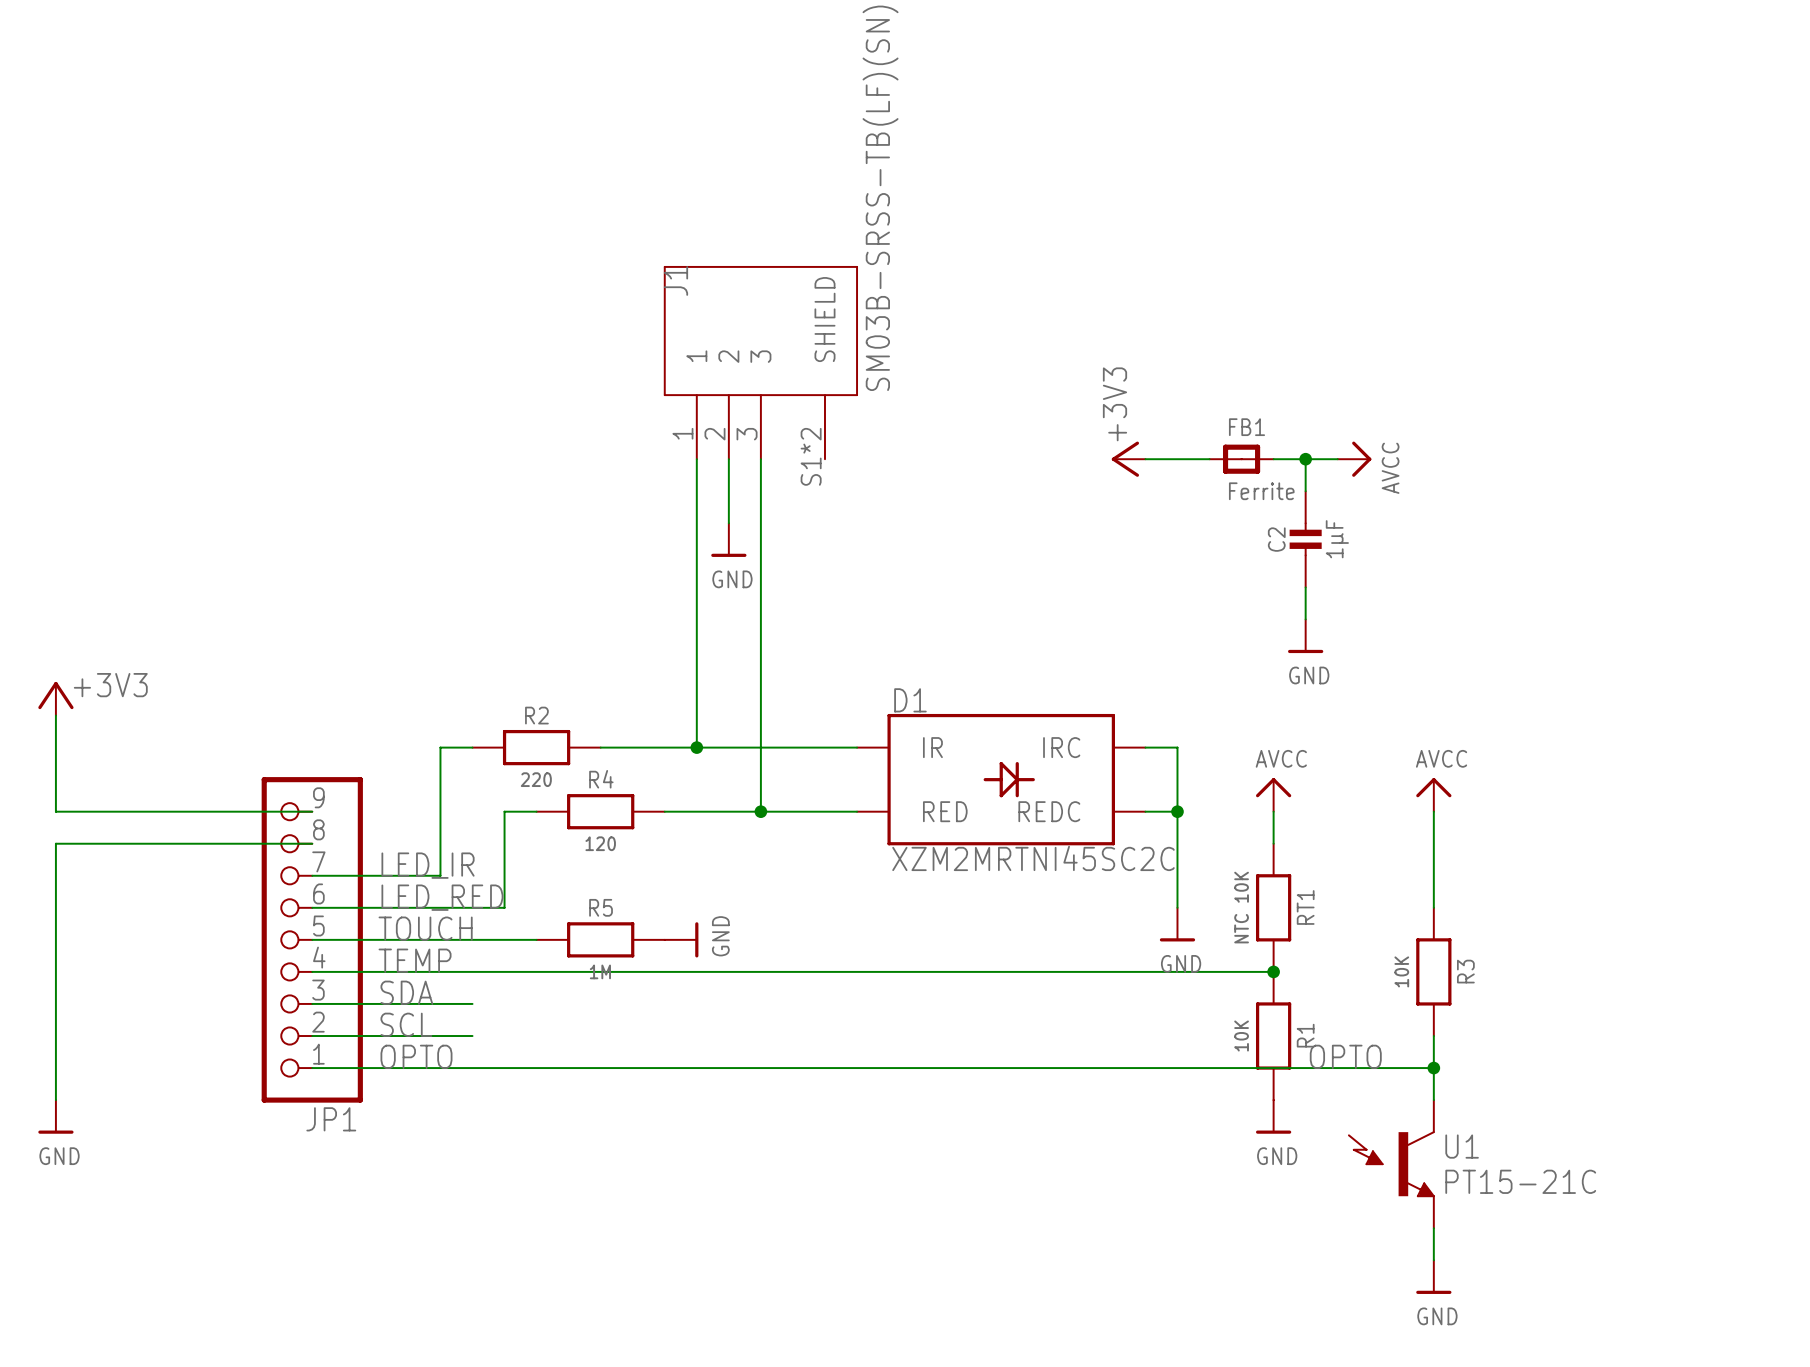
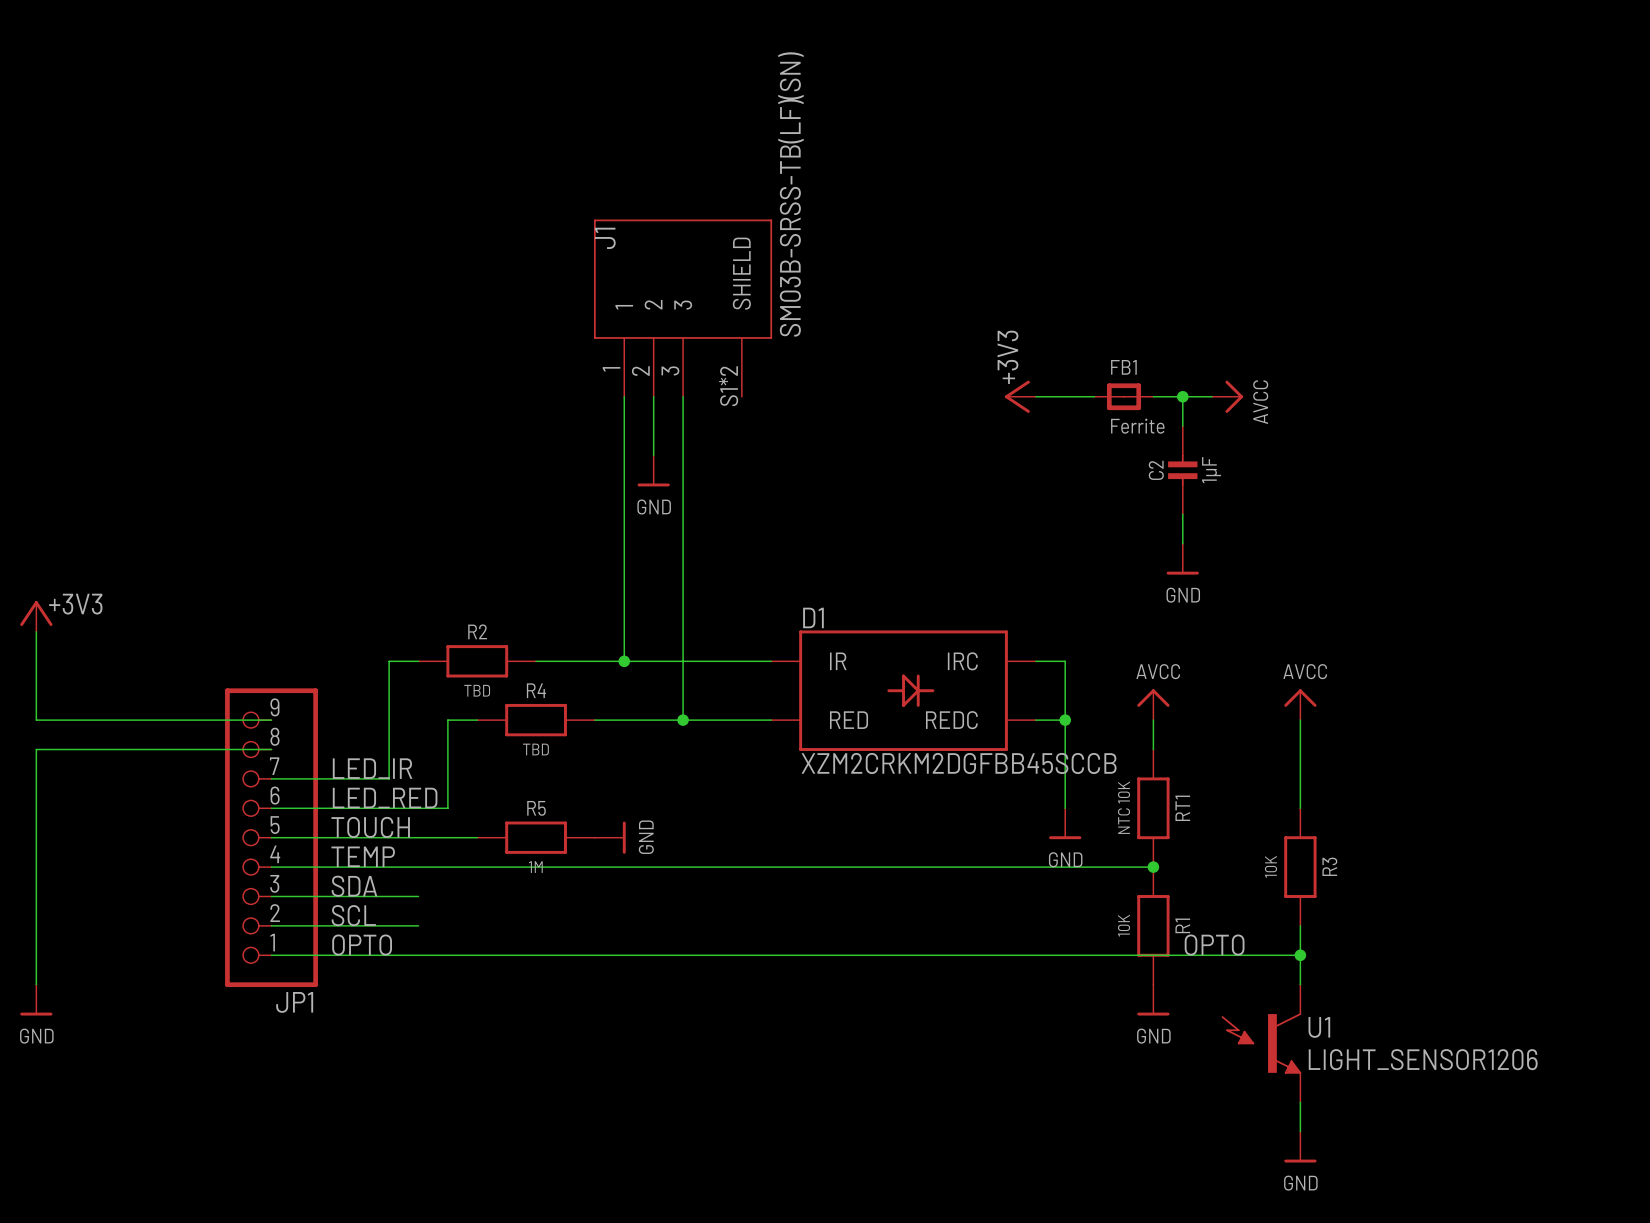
R2 value: 220 (536, 779) -> TBD (477, 690)
R4 value: 120 (600, 843) -> TBD (535, 749)
D1 value: XZM2MRTNI45SC2C (1033, 858) -> XZM2CRKM2DGFBB45SCCB (959, 763)
U1 value: PT15-21C (1520, 1181) -> LIGHT_SENSOR1206 (1423, 1059)

